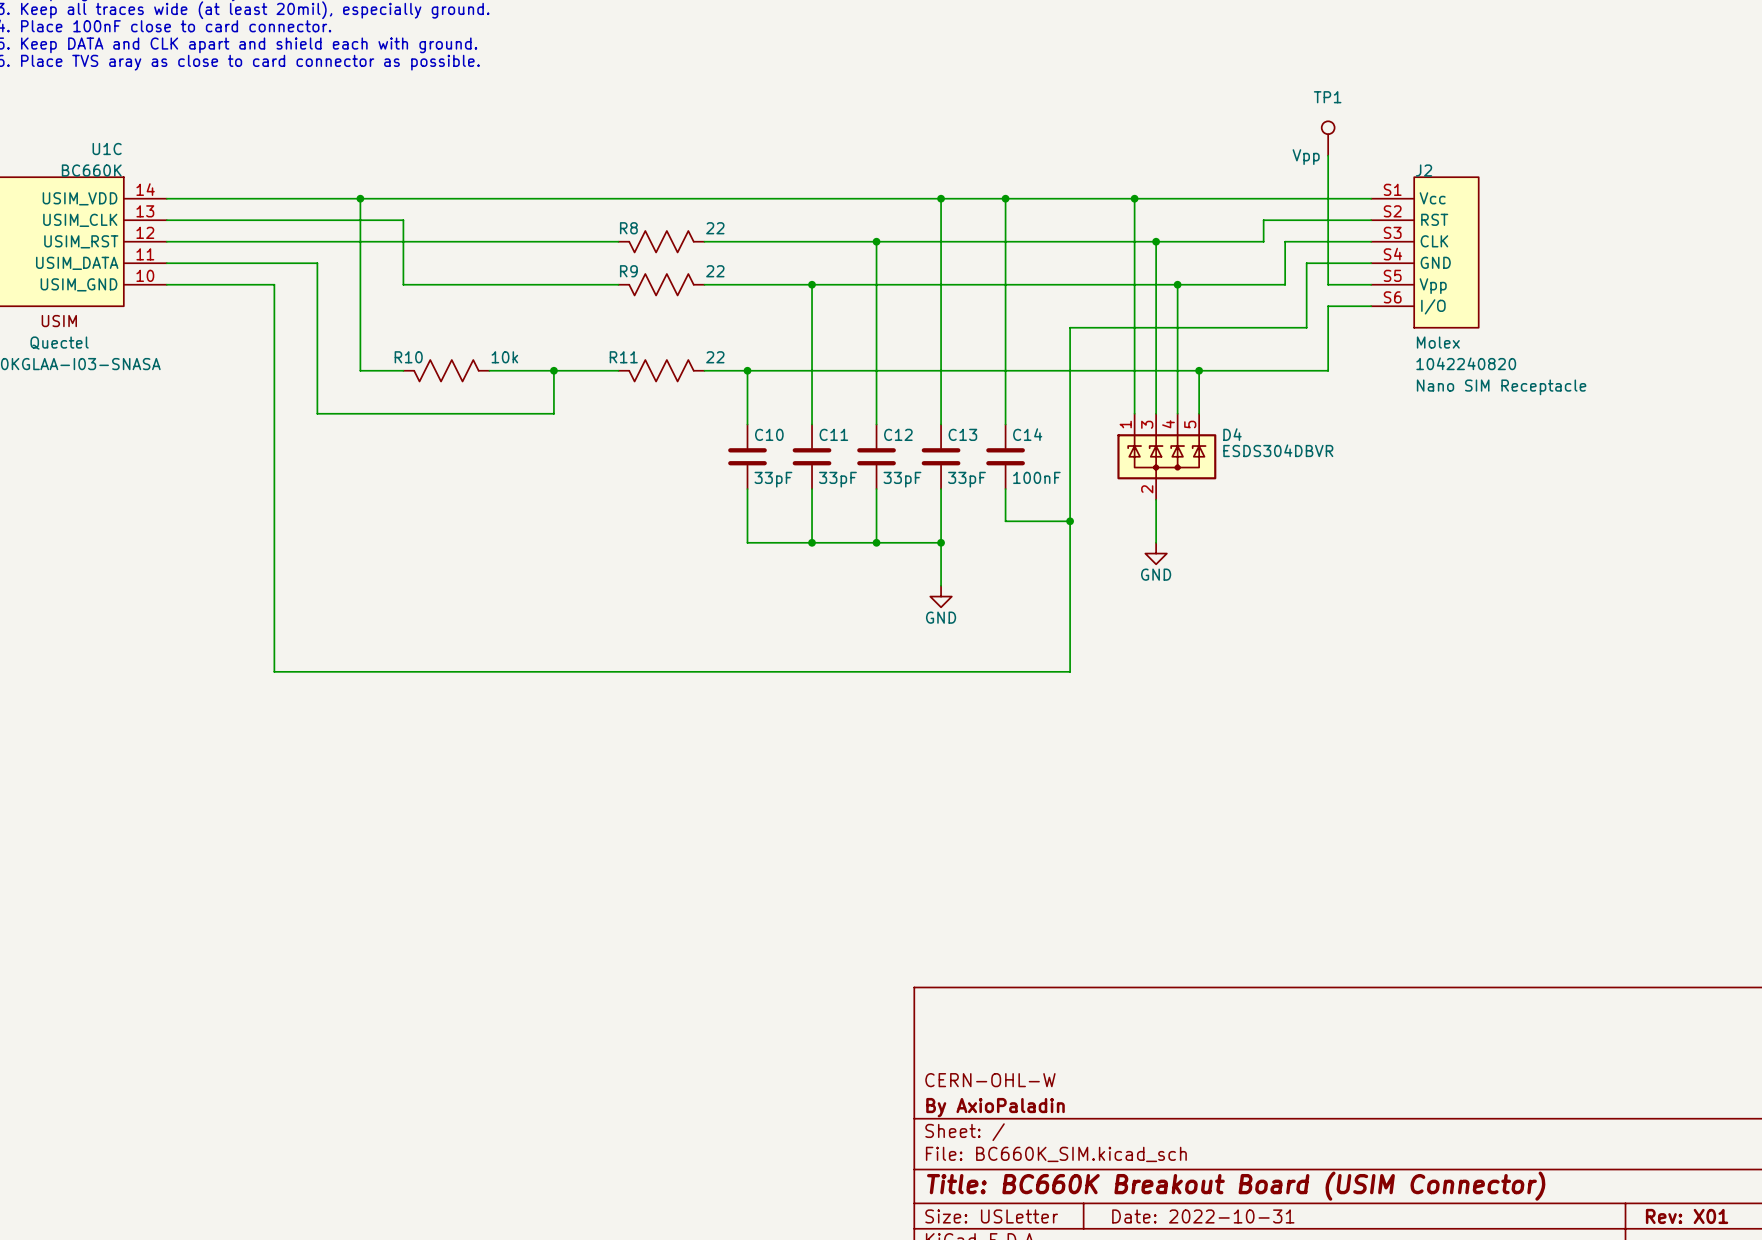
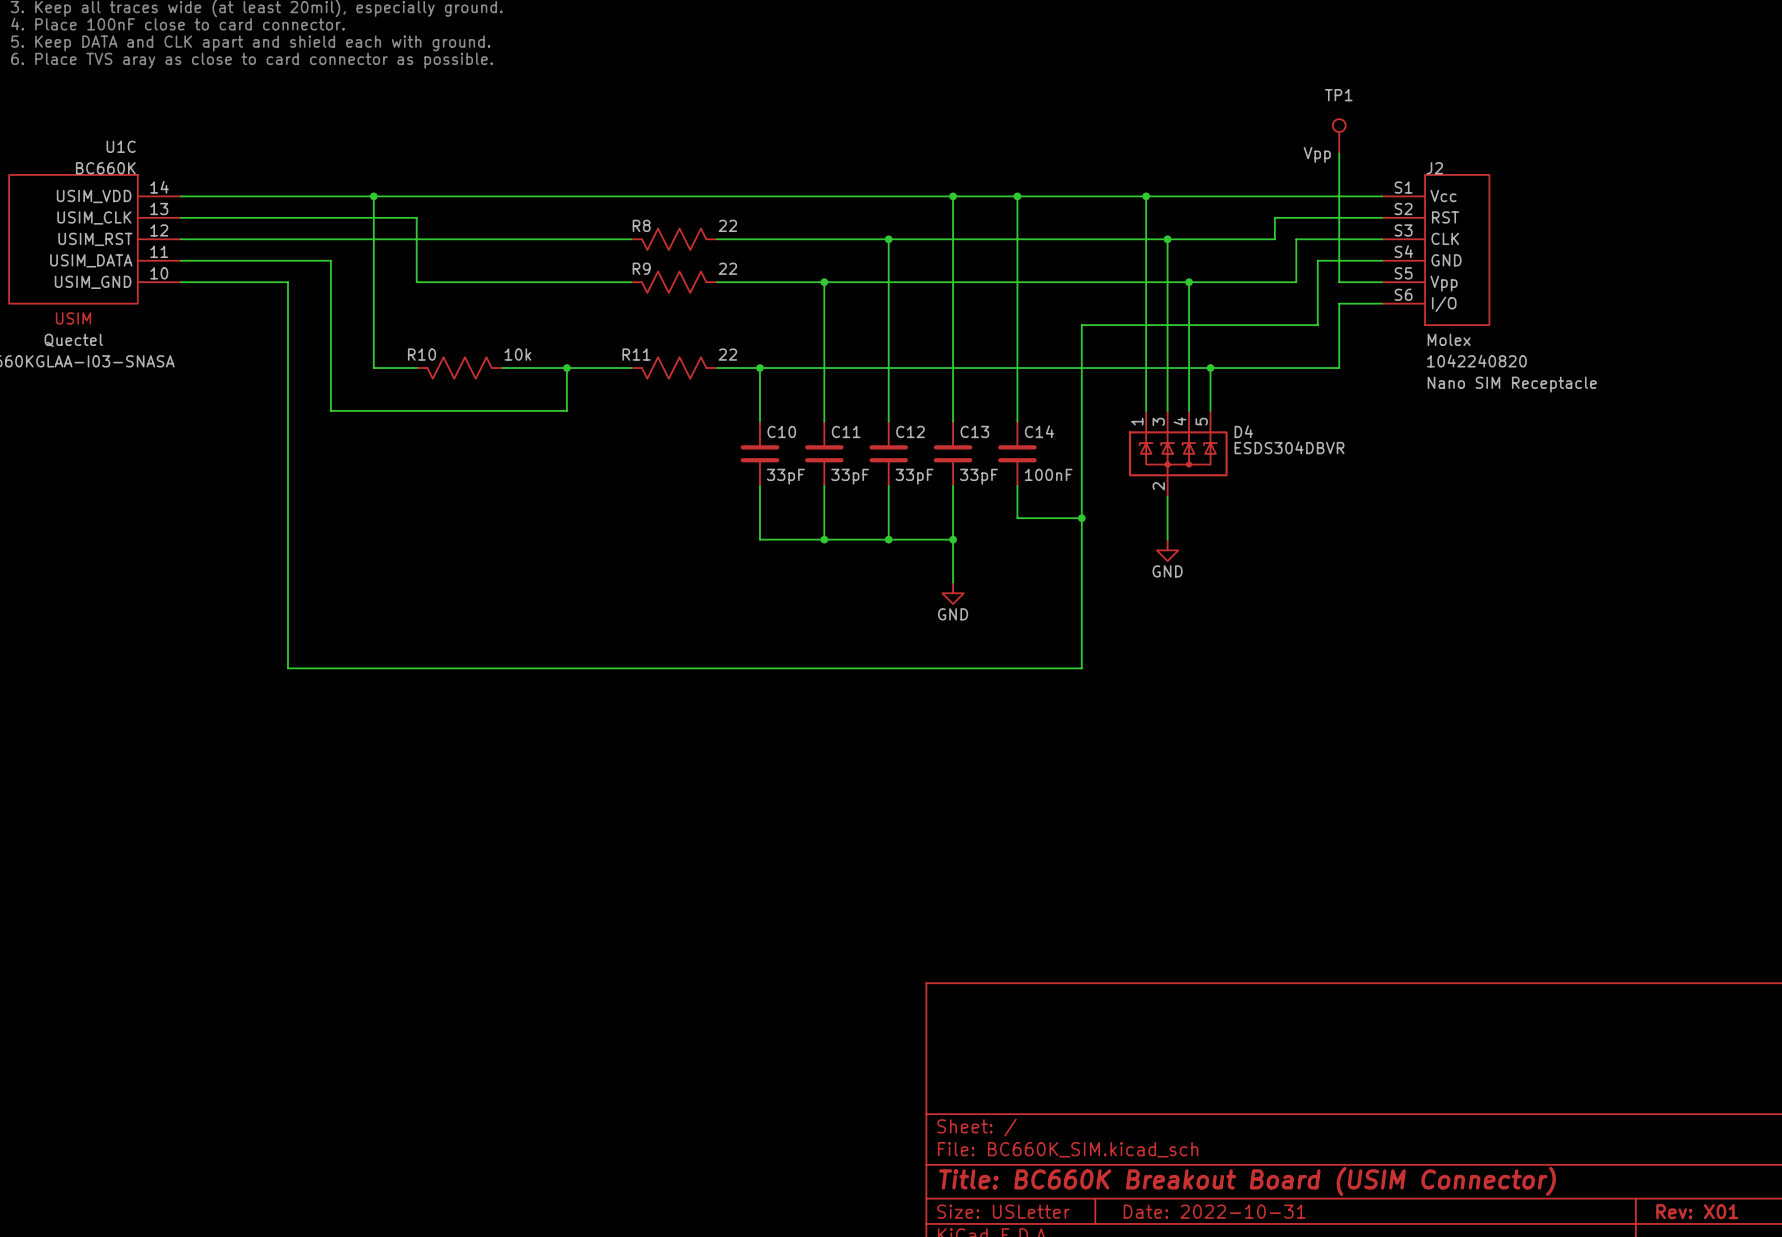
title block: CERN-OHL-W (990, 1080) -> none
title block: By AxioPaladin (995, 1107) -> none

